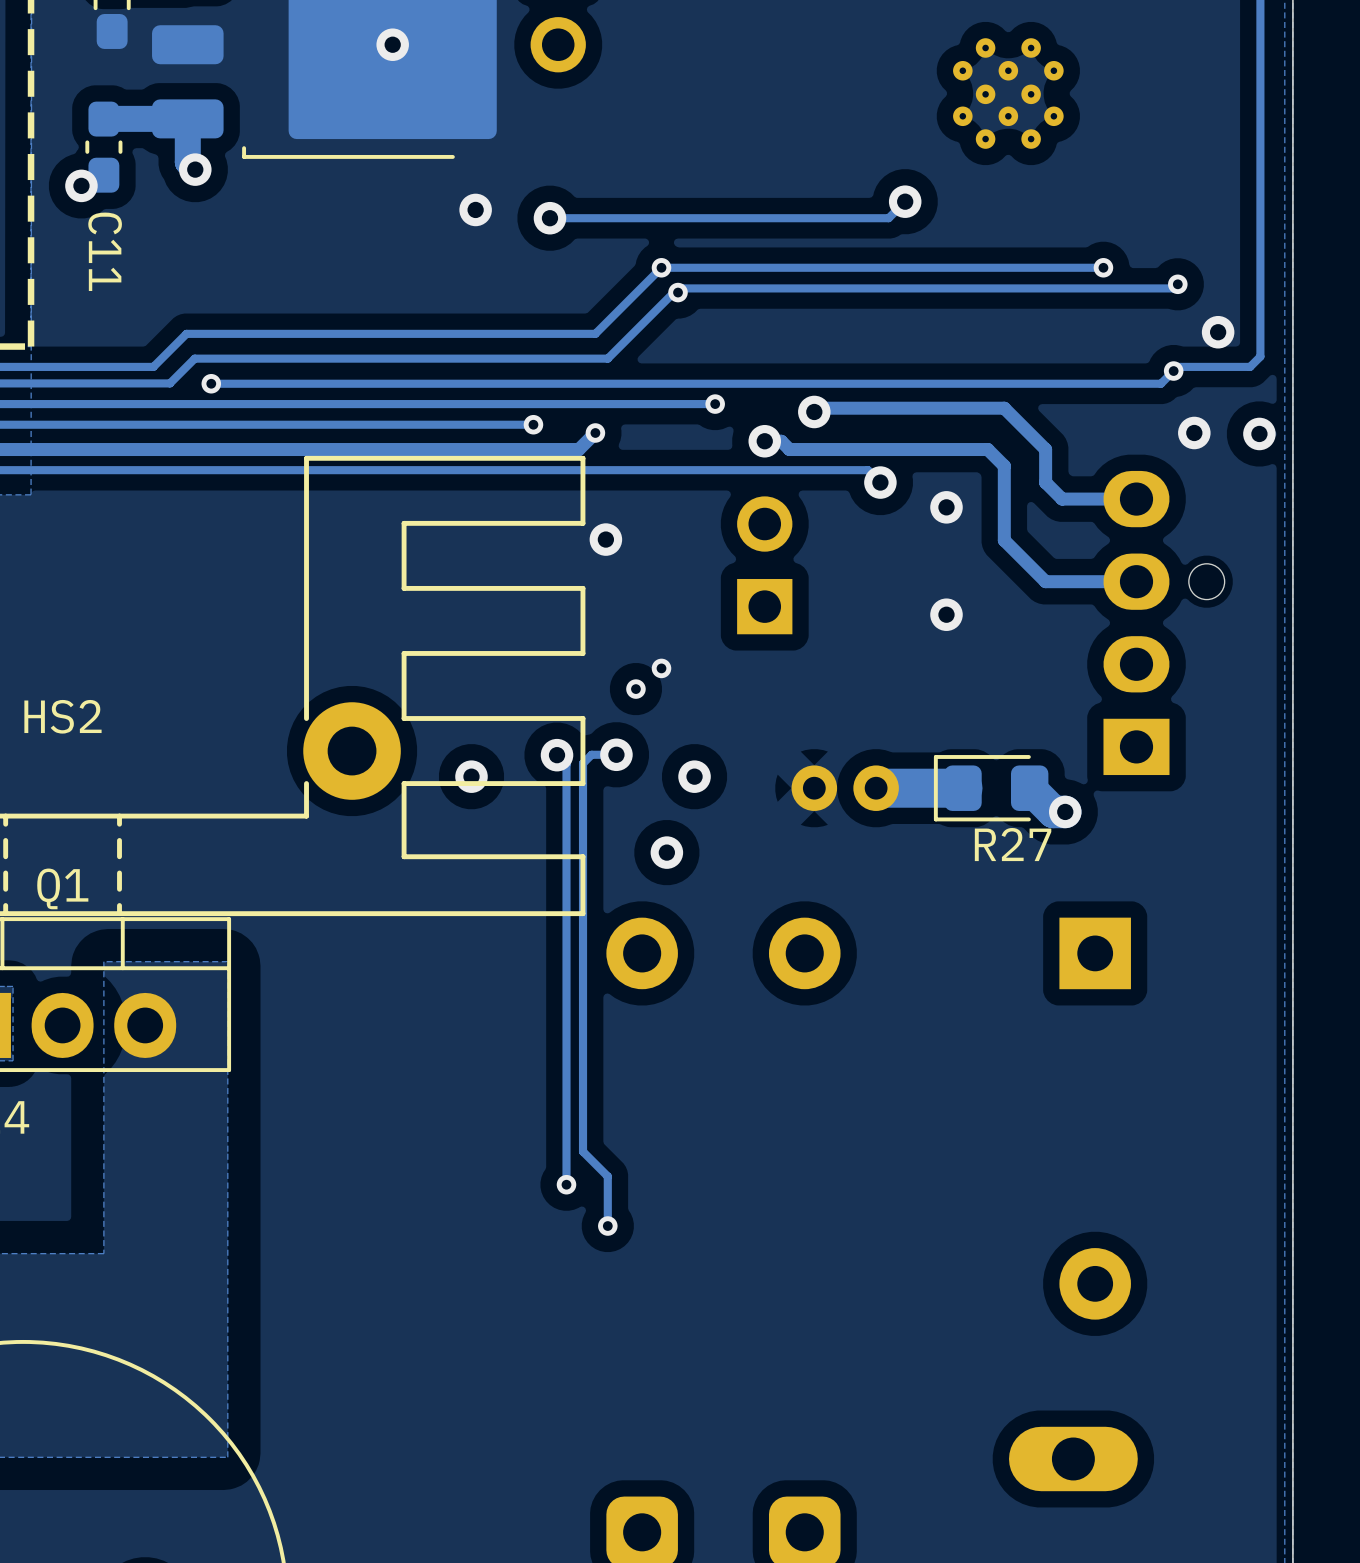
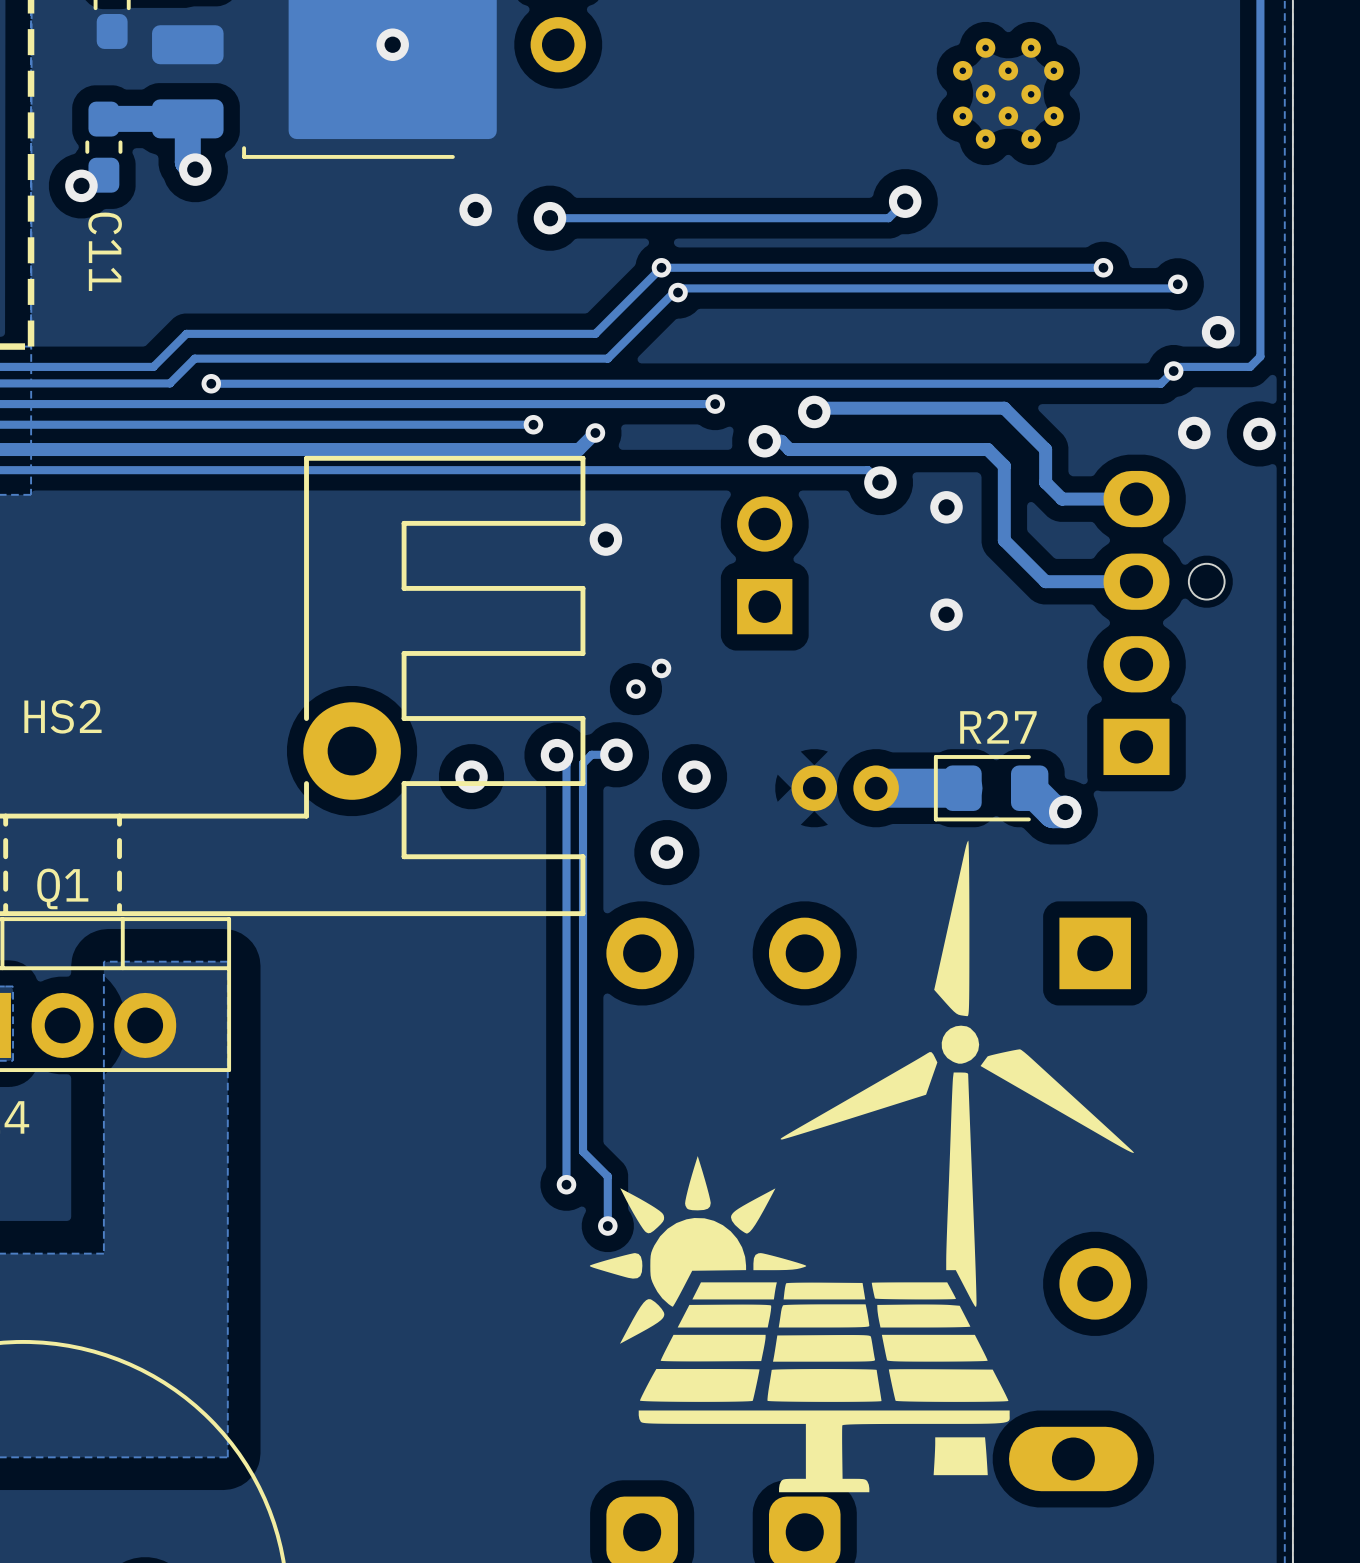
drawing: none -> [589, 840, 1134, 1493]
R27 name position: R27 (1013, 844) -> R27 (998, 727)

